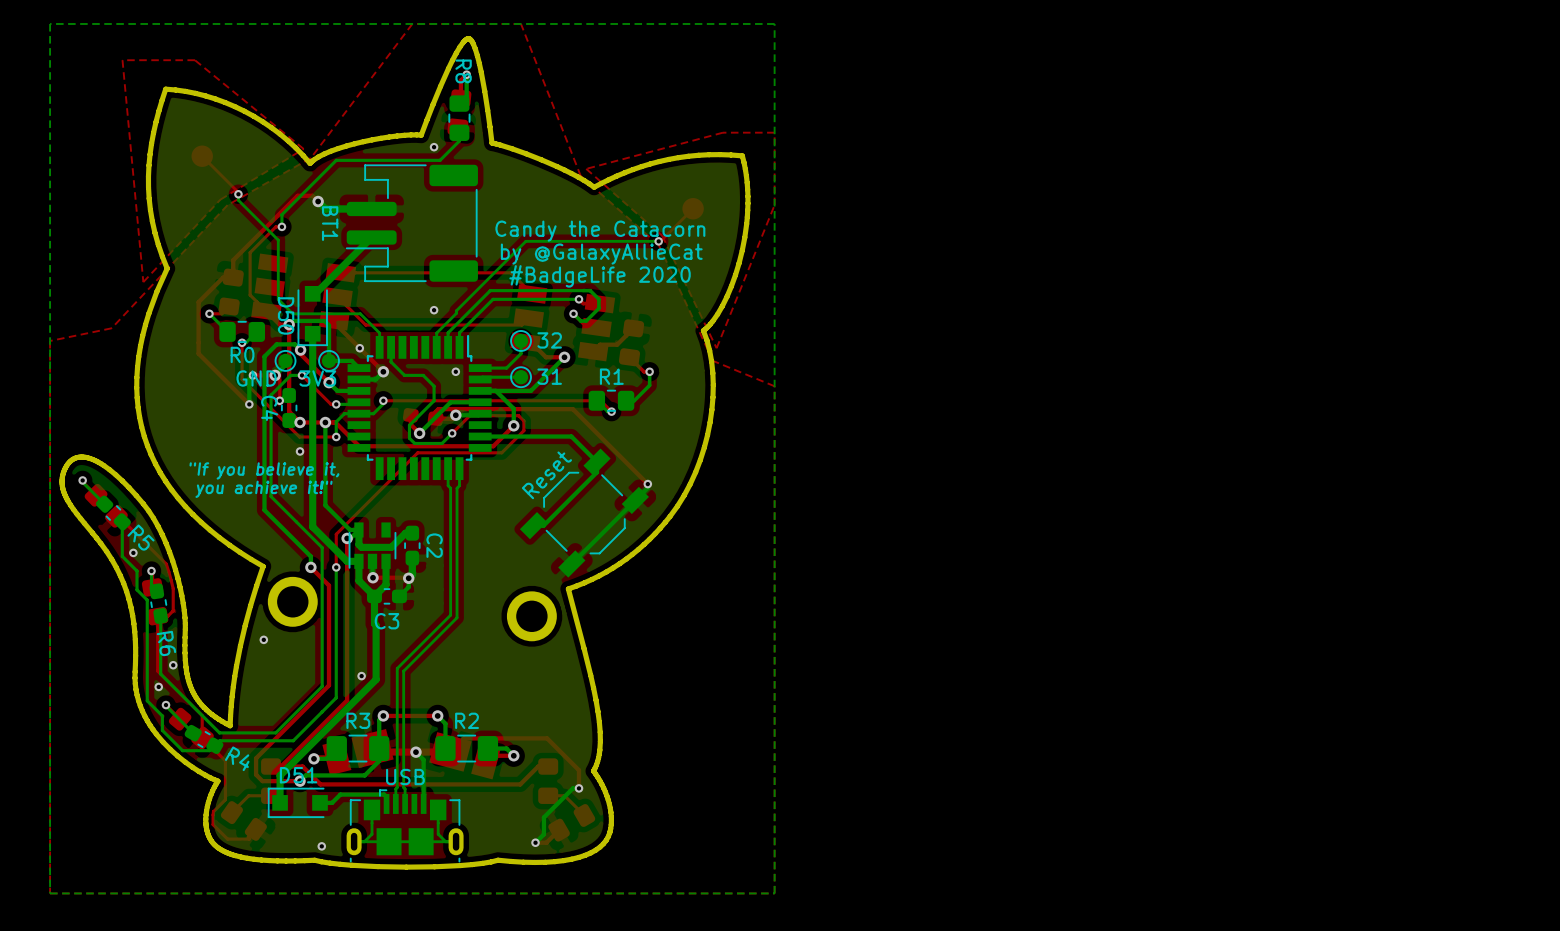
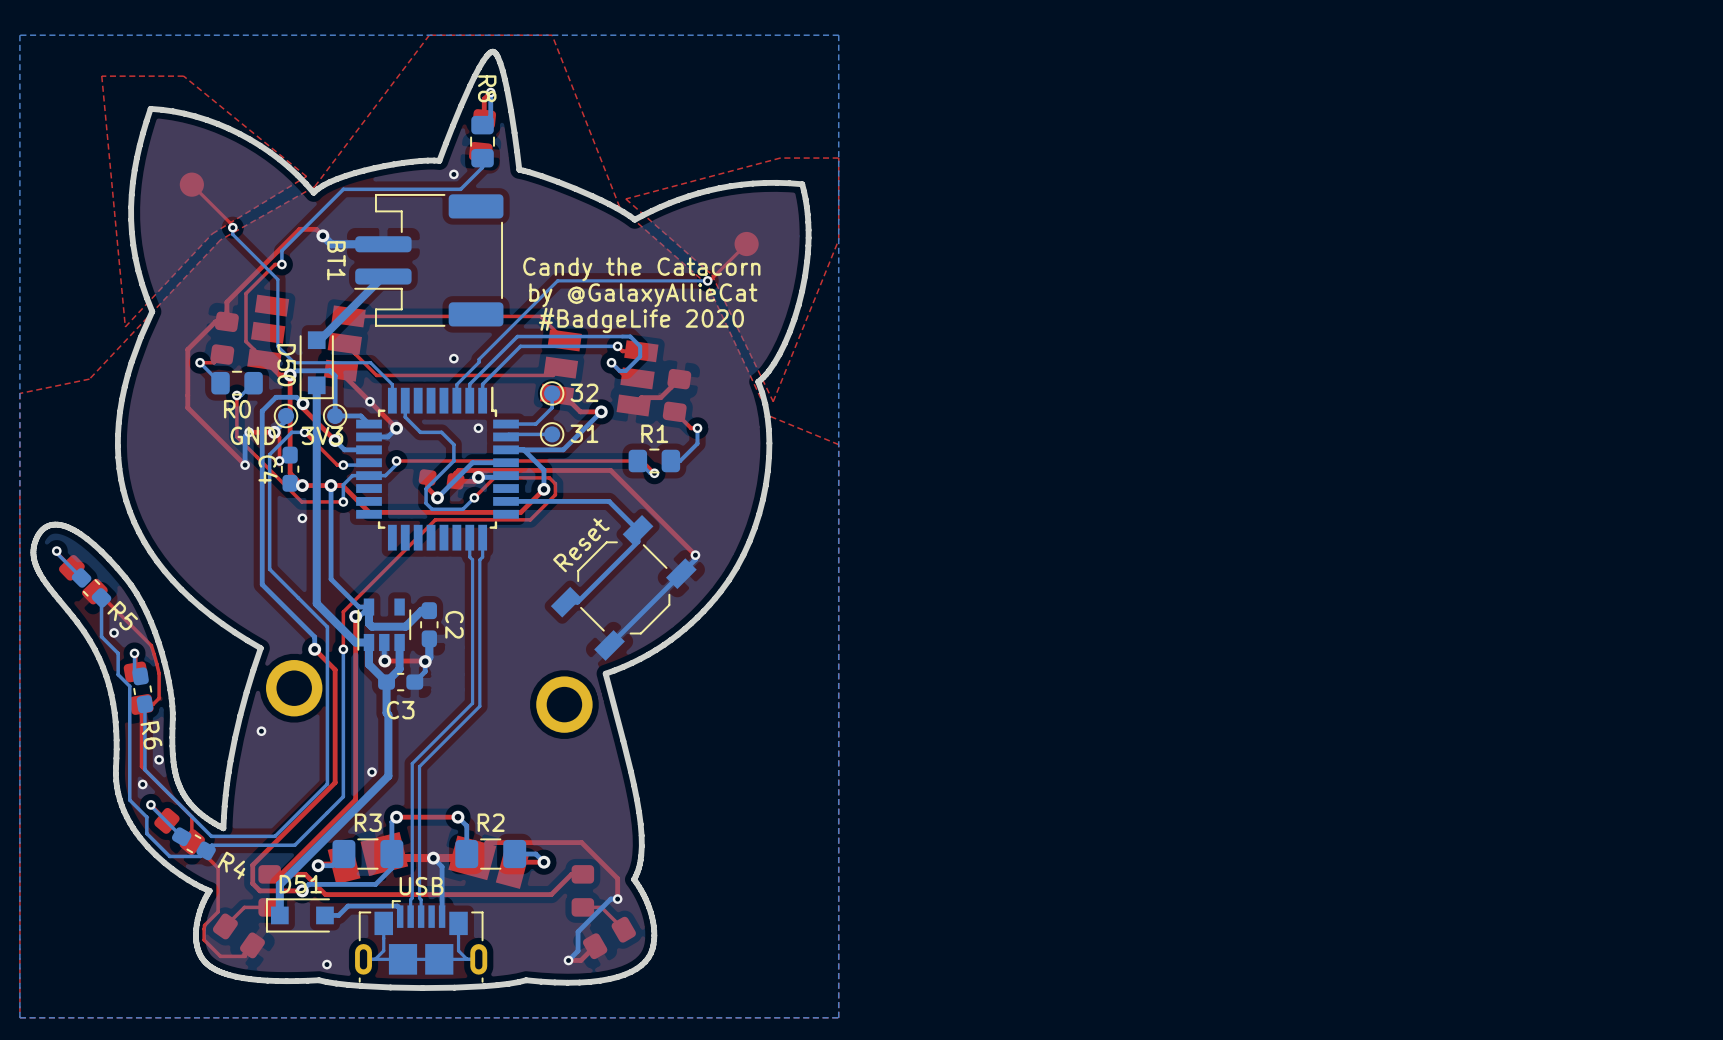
text: "If you believe it, (264, 470) -> none
text: you achieve it!" (264, 489) -> none

